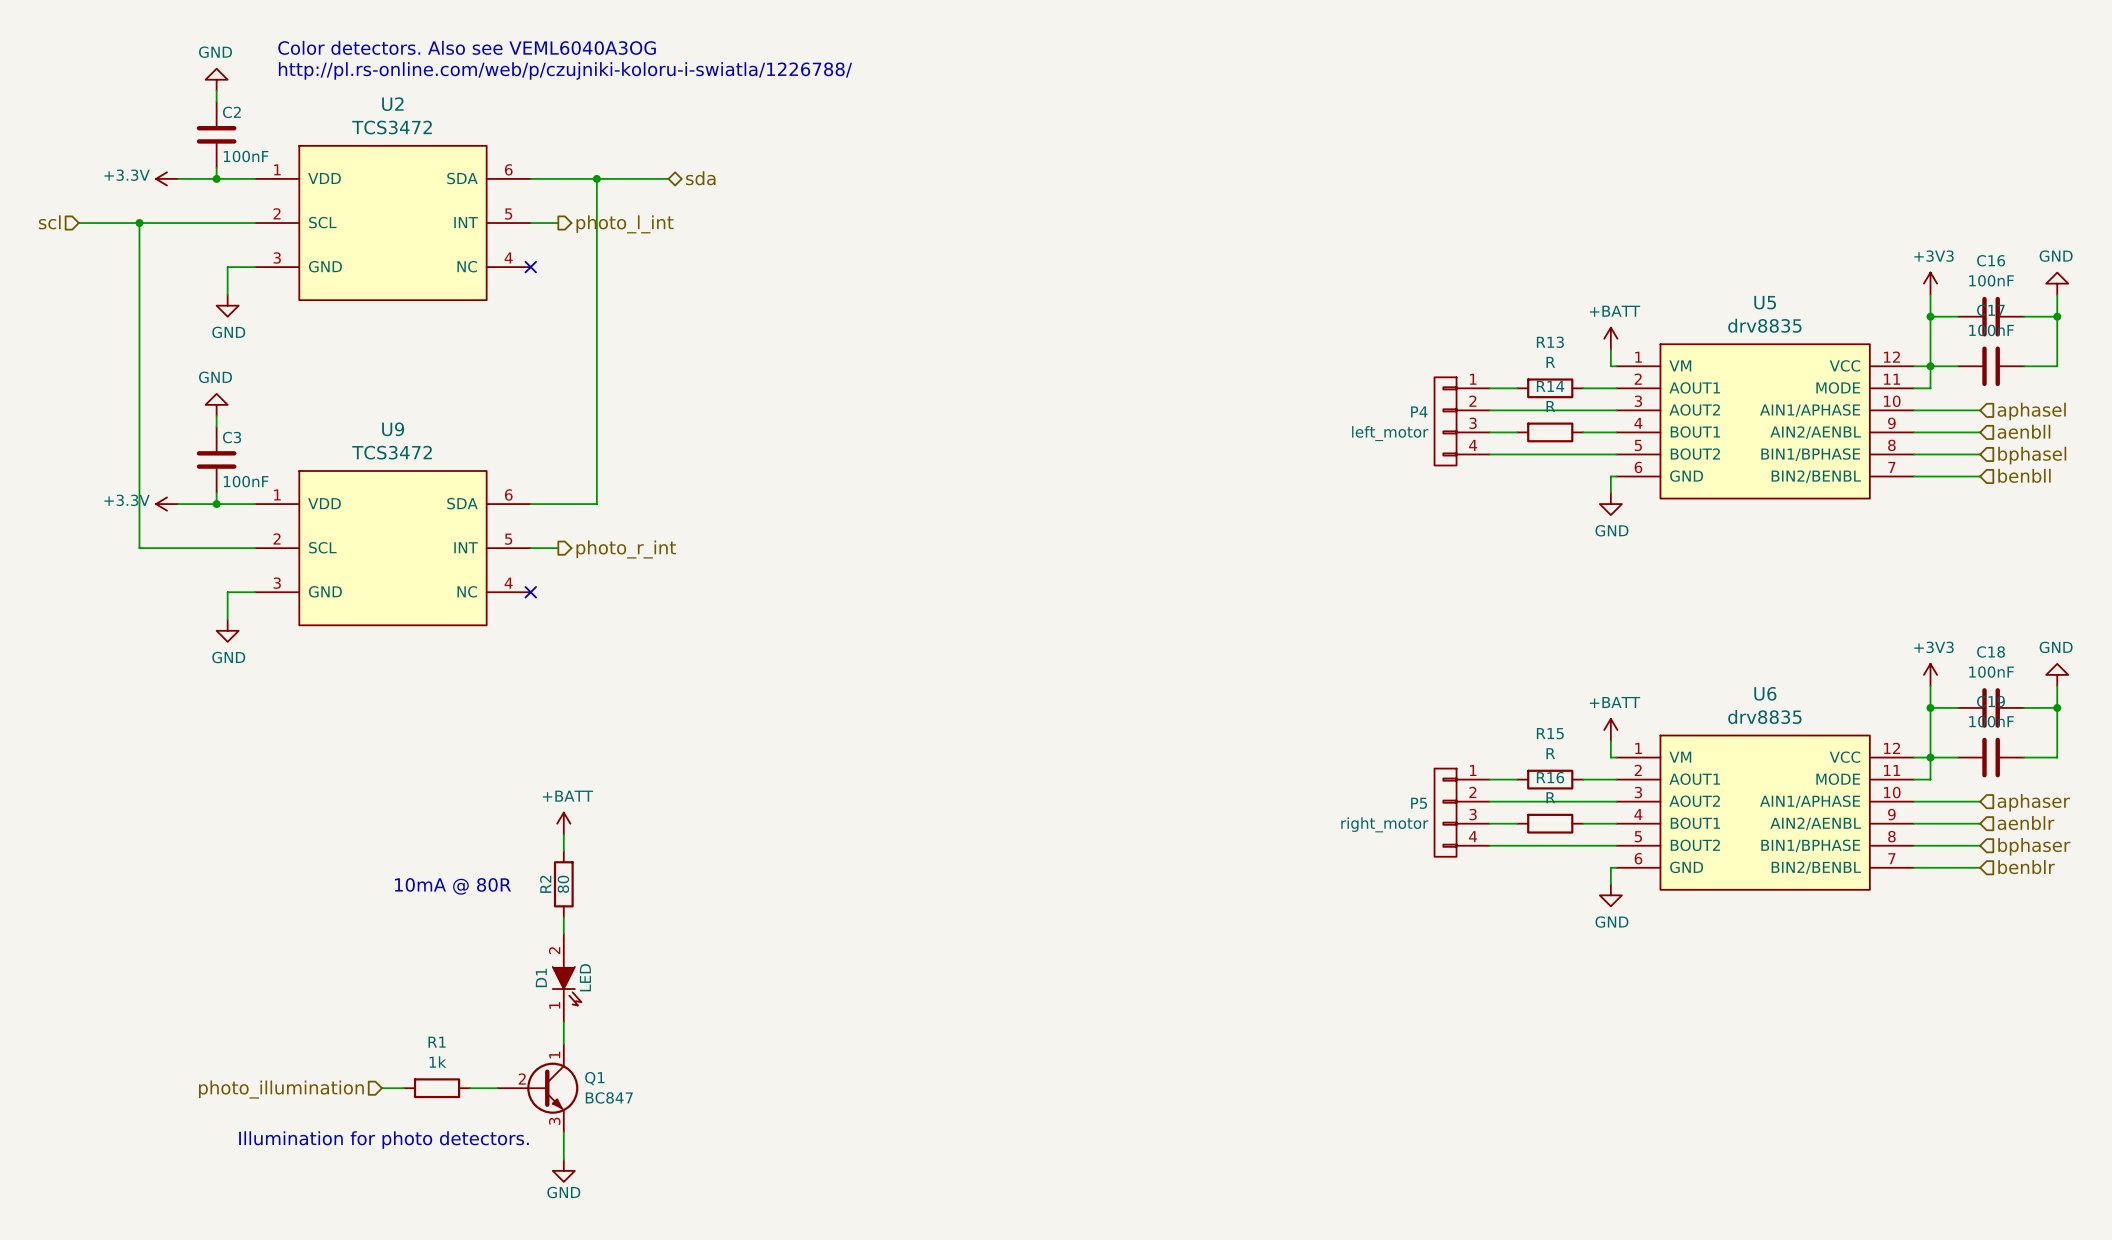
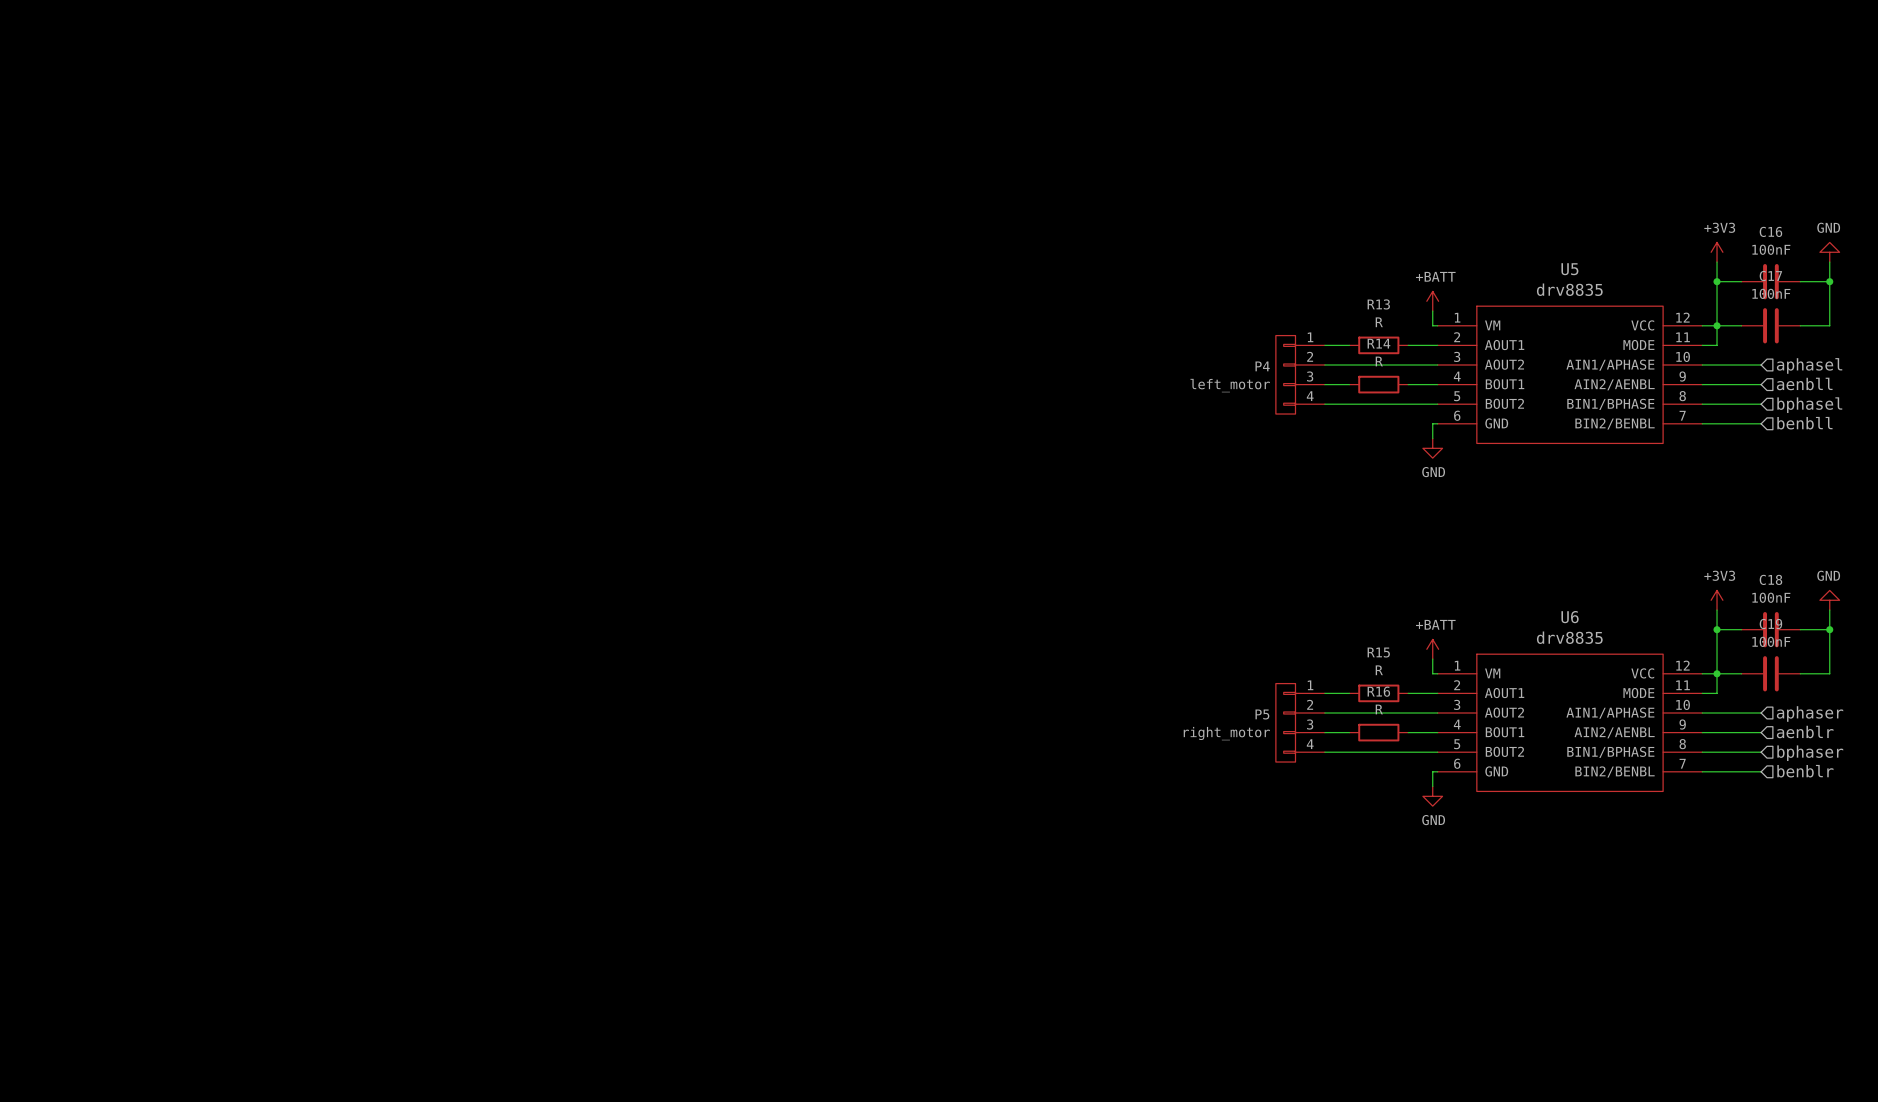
text: Color detectors. Also see VEML6040A3OG (467, 47) -> none
text: http://pl.rs-online.com/web/p/czujniki-koloru-i-swiatla/1226788/ (565, 70) -> none
power symbol: GND (216, 79) -> none
wire: (216, 90) (216, 101) -> none
C2: 100nF (216, 134) -> none
wire: (216, 167) (216, 178) -> none
power symbol: +3.3V (167, 178) -> none
wire: (178, 178) (255, 178) -> none
junction: (216, 178) -> none
wire: (530, 178) (668, 178) -> none
wire: (596, 178) (596, 504) (530, 504) -> none
junction: (596, 178) -> none
hierarchical label: sda (700, 178) -> none
hierarchical label: scl (49, 222) -> none
wire: (78, 223) (255, 223) -> none
wire: (139, 223) (139, 548) (255, 548) -> none
junction: (139, 223) -> none
U2: TCS3472 (392, 223) -> none
wire: (530, 223) (558, 223) -> none
hierarchical label: photo_l_int (625, 224) -> none
wire: (255, 267) (227, 267) (227, 294) -> none
no-connect mark: (530, 267) -> none
power symbol: GND (227, 305) -> none
power symbol: GND (216, 404) -> none
wire: (216, 415) (216, 426) -> none
C3: 100nF (216, 459) -> none
wire: (216, 493) (216, 504) -> none
power symbol: +3.3V (167, 504) -> none
wire: (178, 504) (255, 504) -> none
junction: (216, 504) -> none
U9: TCS3472 (392, 548) -> none
wire: (530, 548) (558, 548) -> none
hierarchical label: photo_r_int (626, 549) -> none
wire: (255, 592) (227, 592) (227, 619) -> none
no-connect mark: (530, 592) -> none
power symbol: GND (227, 630) -> none
power symbol: +BATT (563, 823) -> none
wire: (563, 834) (563, 851) -> none
R2: 80 (563, 884) -> none
text: 10mA @ 80R (452, 886) -> none
wire: (563, 917) (563, 933) -> none
D1: LED (567, 977) -> none
wire: (563, 1022) (563, 1044) -> none
wire: (381, 1088) (403, 1088) -> none
R1: 1k (437, 1088) -> none
wire: (470, 1088) (497, 1088) -> none
Q1: BC847 (538, 1088) -> none
hierarchical label: photo_illumination (281, 1089) -> none
wire: (563, 1132) (563, 1159) -> none
text: Illumination for photo detectors. (383, 1140) -> none
power symbol: GND (563, 1170) -> none

